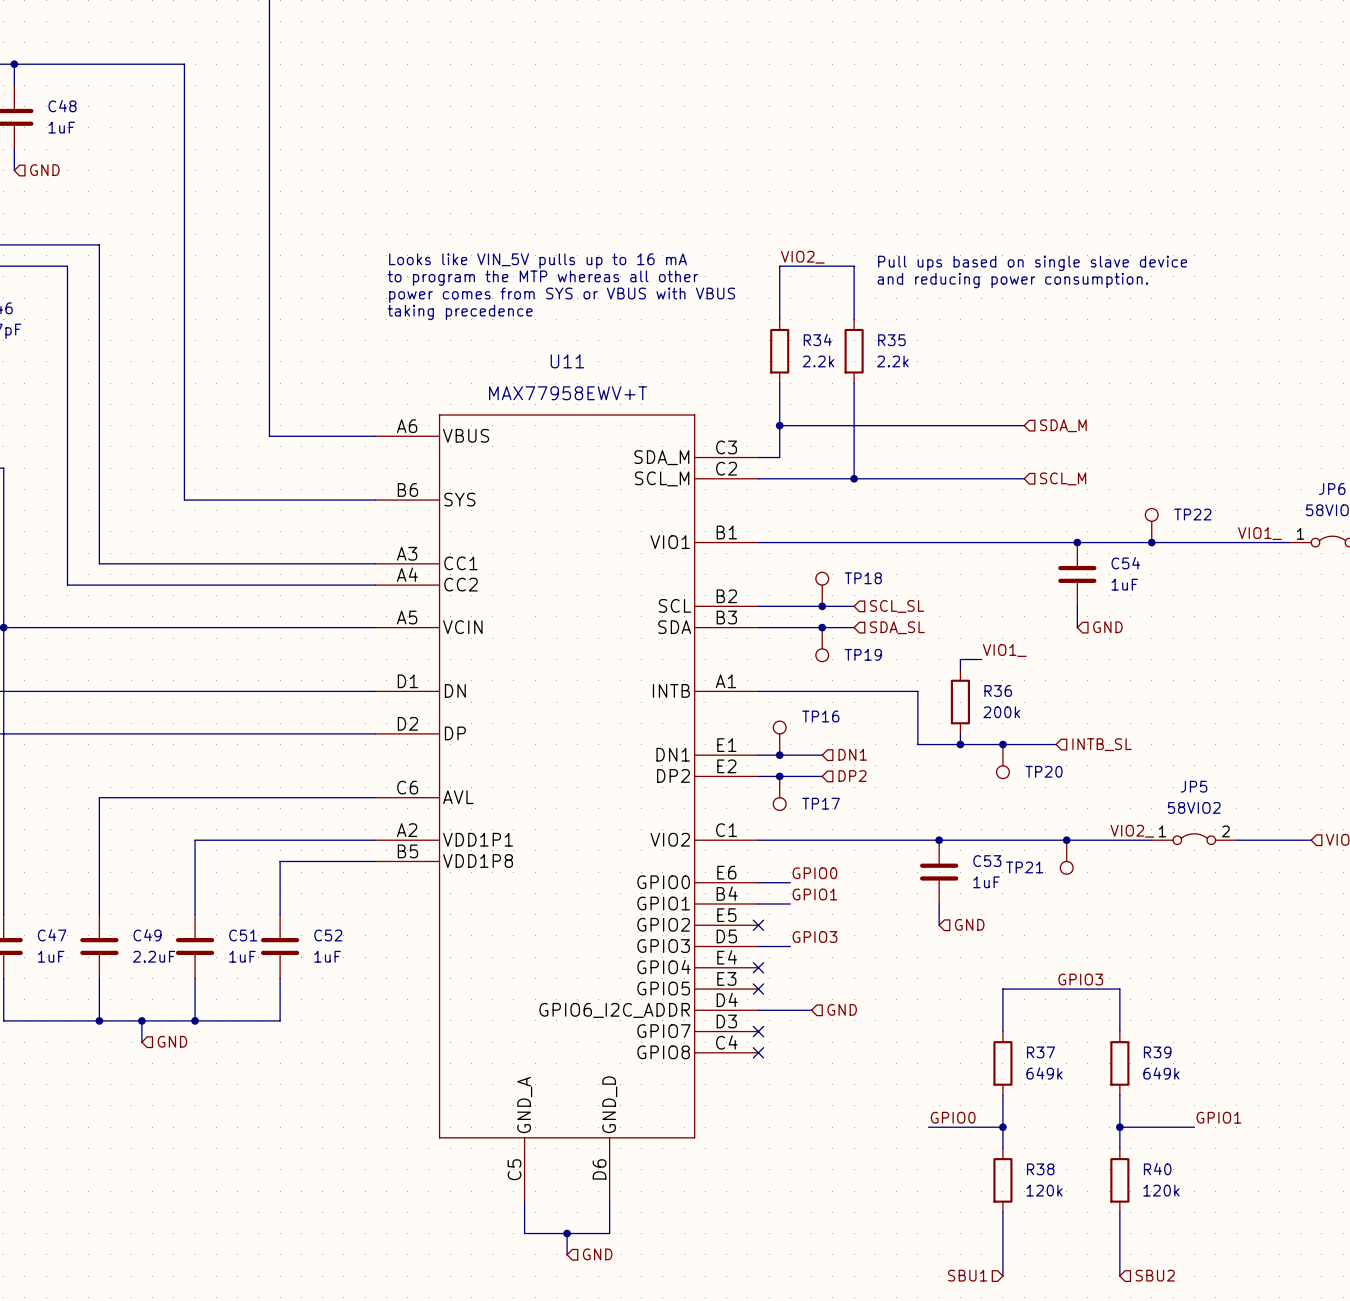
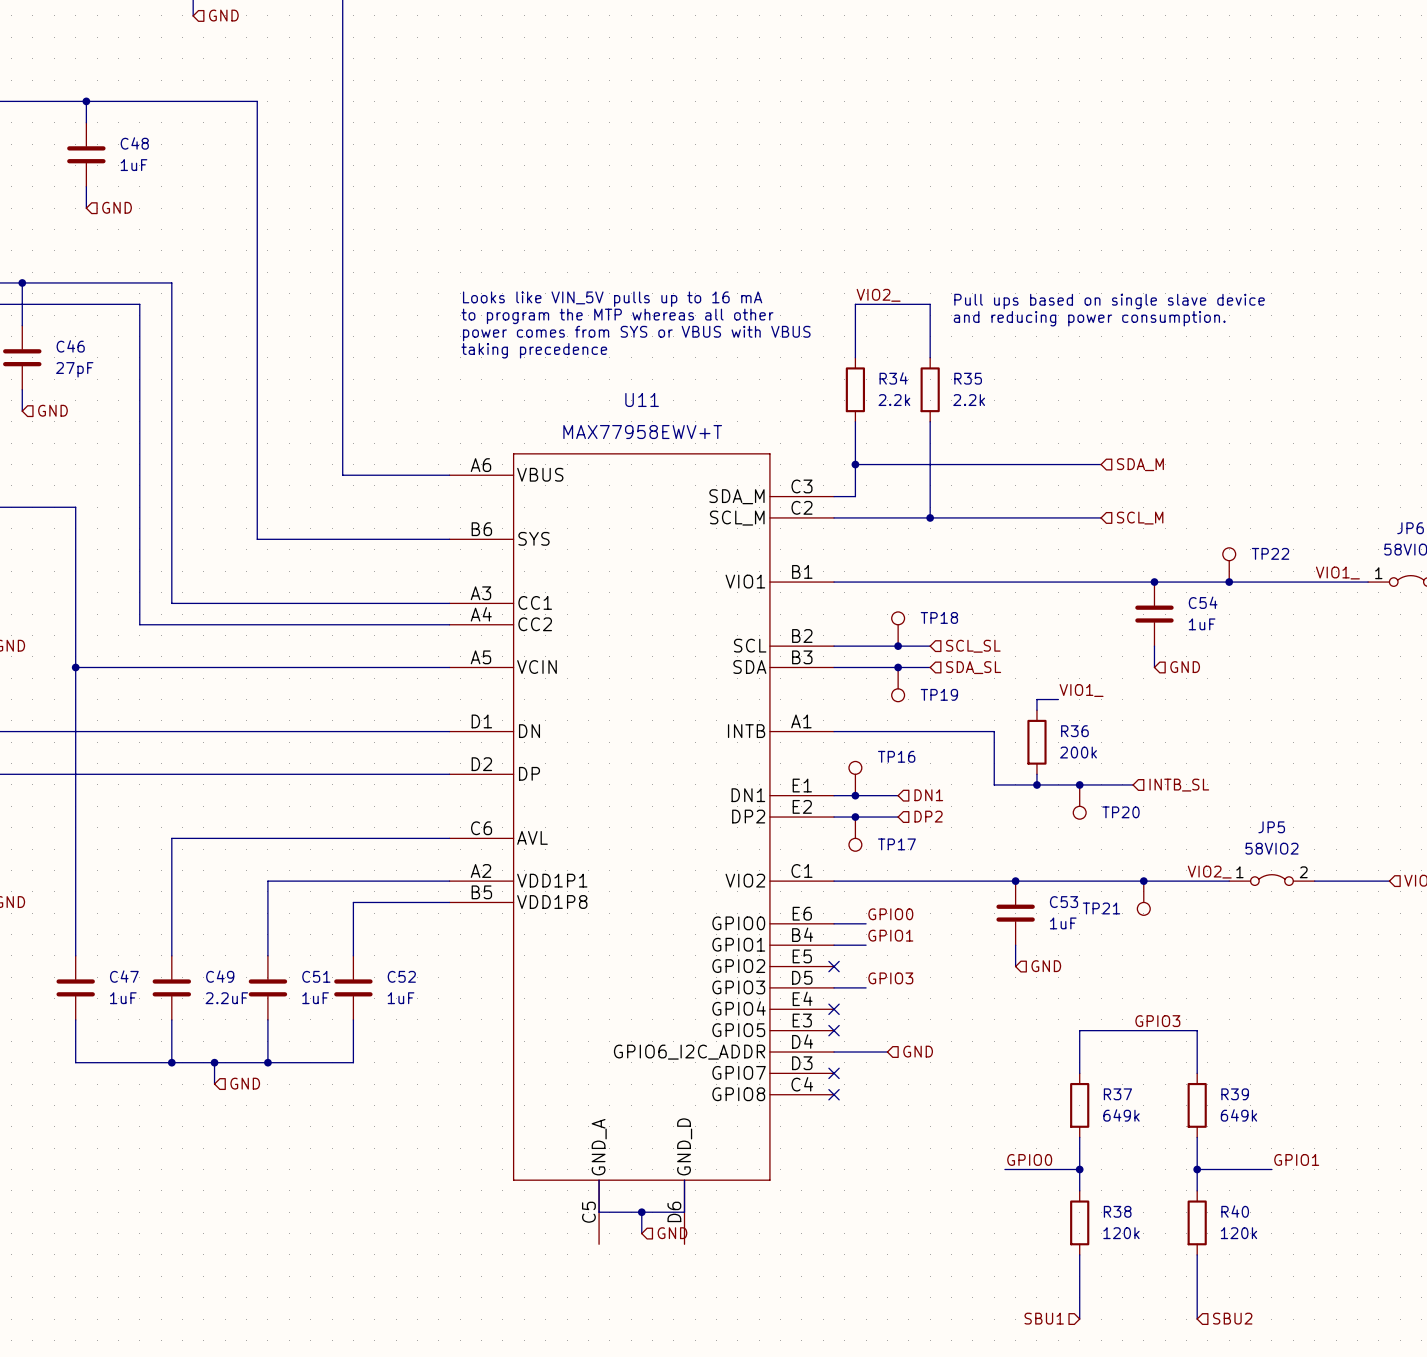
junction: none -> (641, 1212)
wire: (524, 1201) (524, 1233) (609, 1233) (609, 1201) -> (599, 1180) (599, 1212) (684, 1212) (684, 1180)
wire: (567, 1233) (567, 1254) -> (641, 1212) (641, 1233)
junction: (567, 1233) -> none
hierarchical label position: GND (597, 1254) -> GND (672, 1233)

